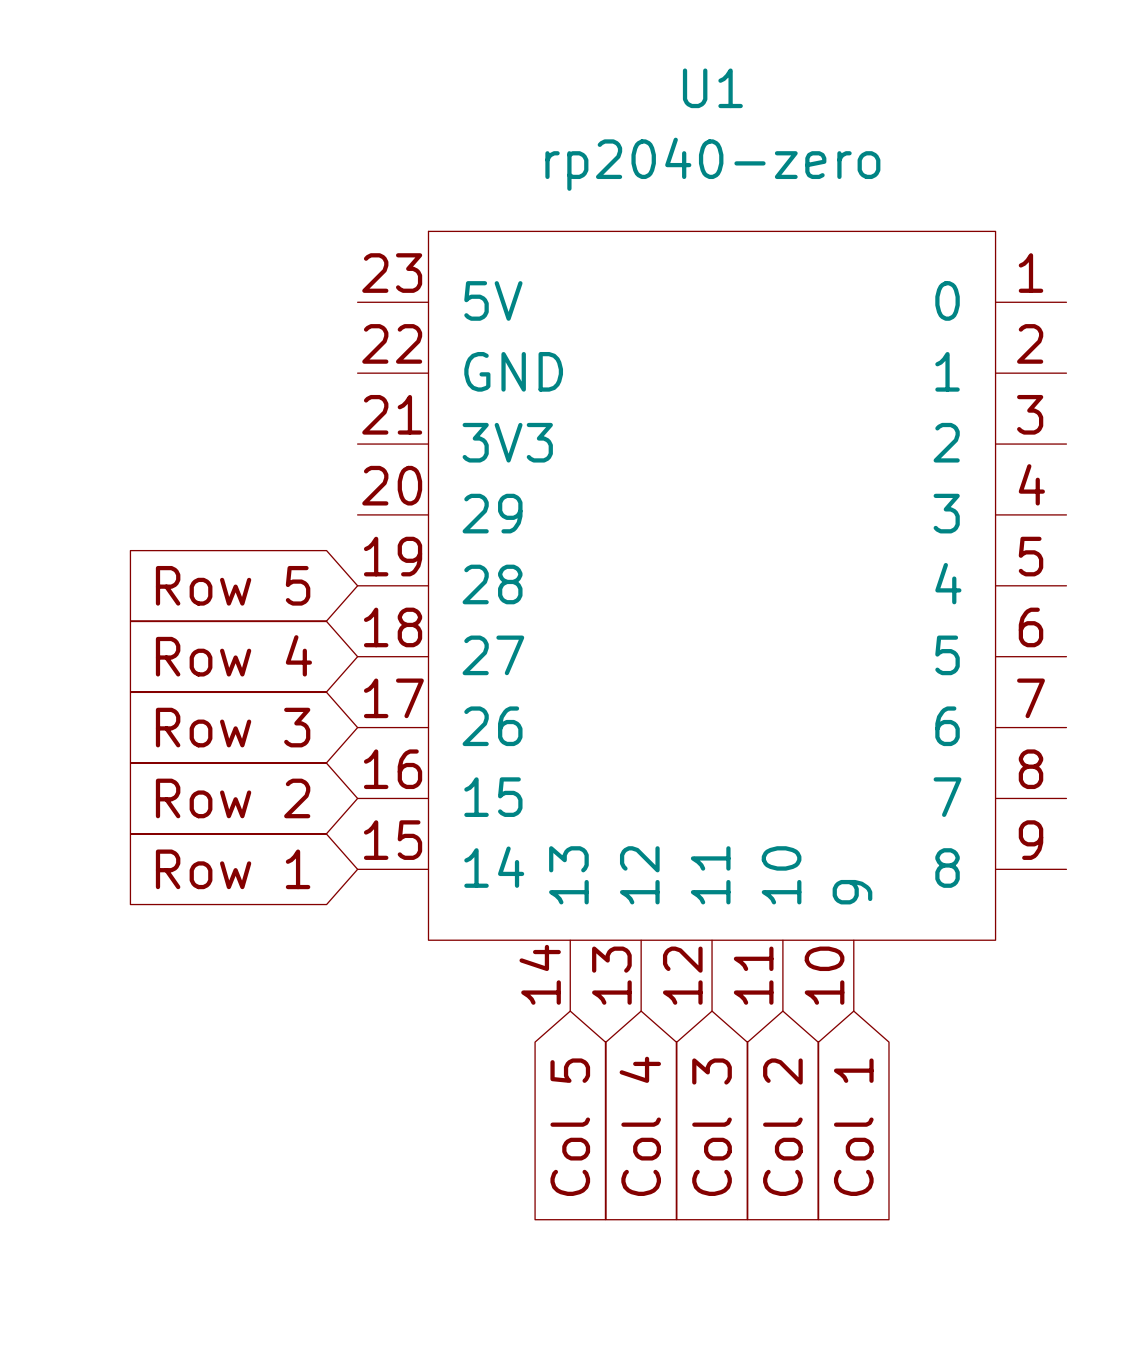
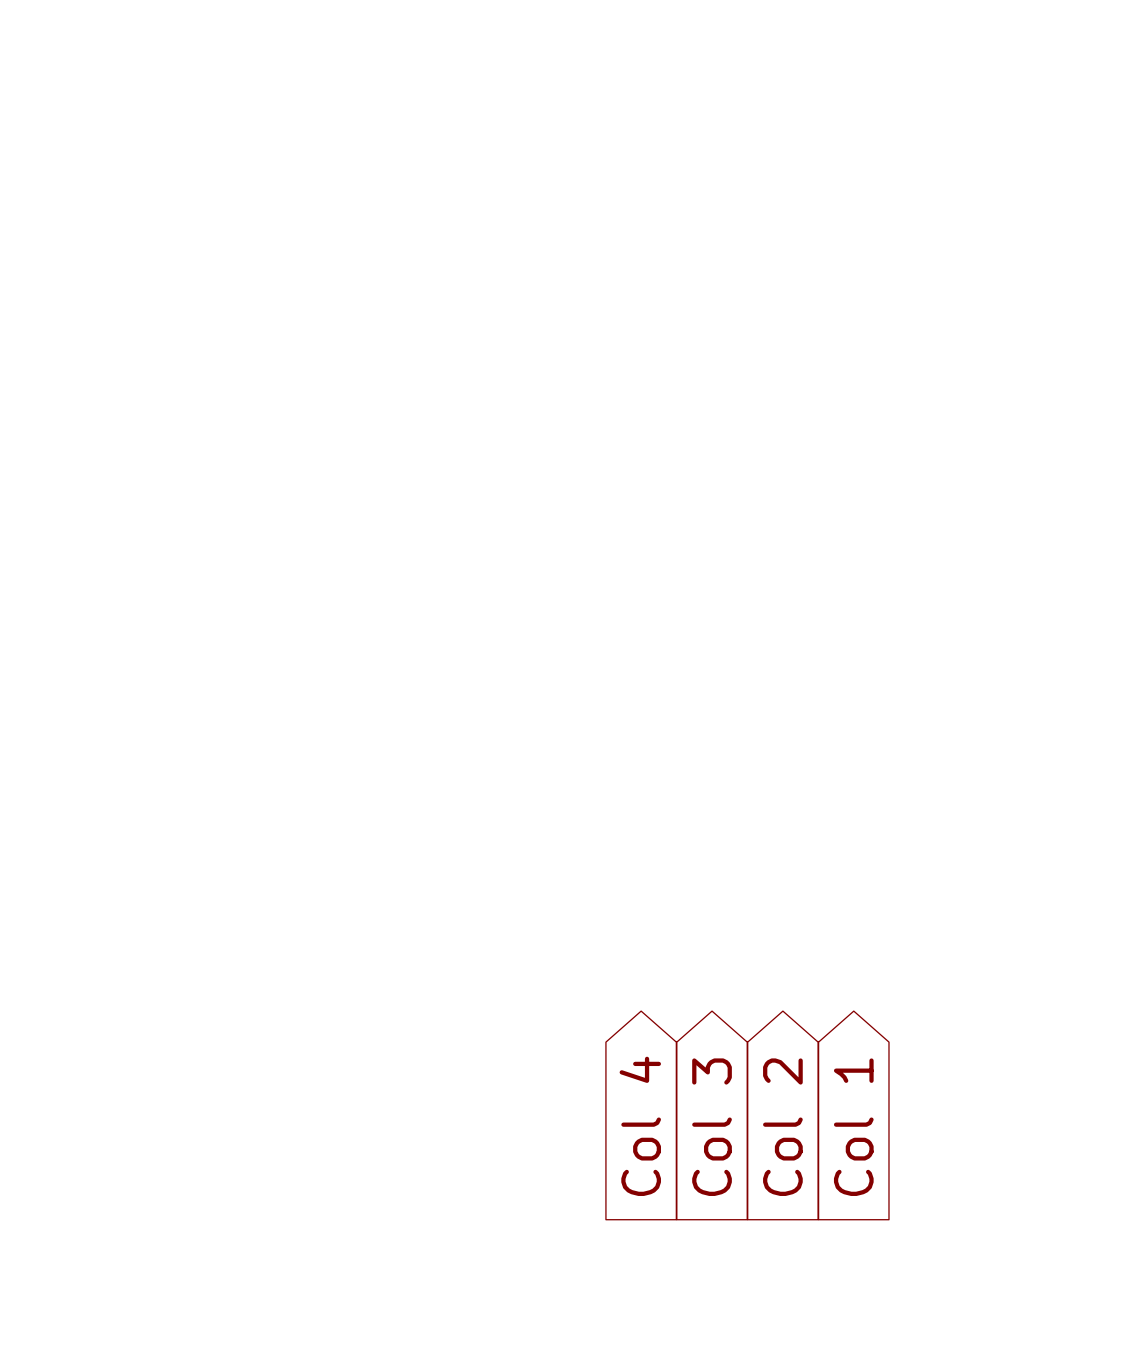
global label: Row 5 (233, 585) -> none
U1: rp2040-zero (712, 621) -> none
global label: Row 4 (233, 655) -> none
global label: Row 3 (233, 727) -> none
global label: Row 2 (233, 798) -> none
global label: Row 1 (233, 869) -> none
global label: Col 5 (570, 1127) -> none

